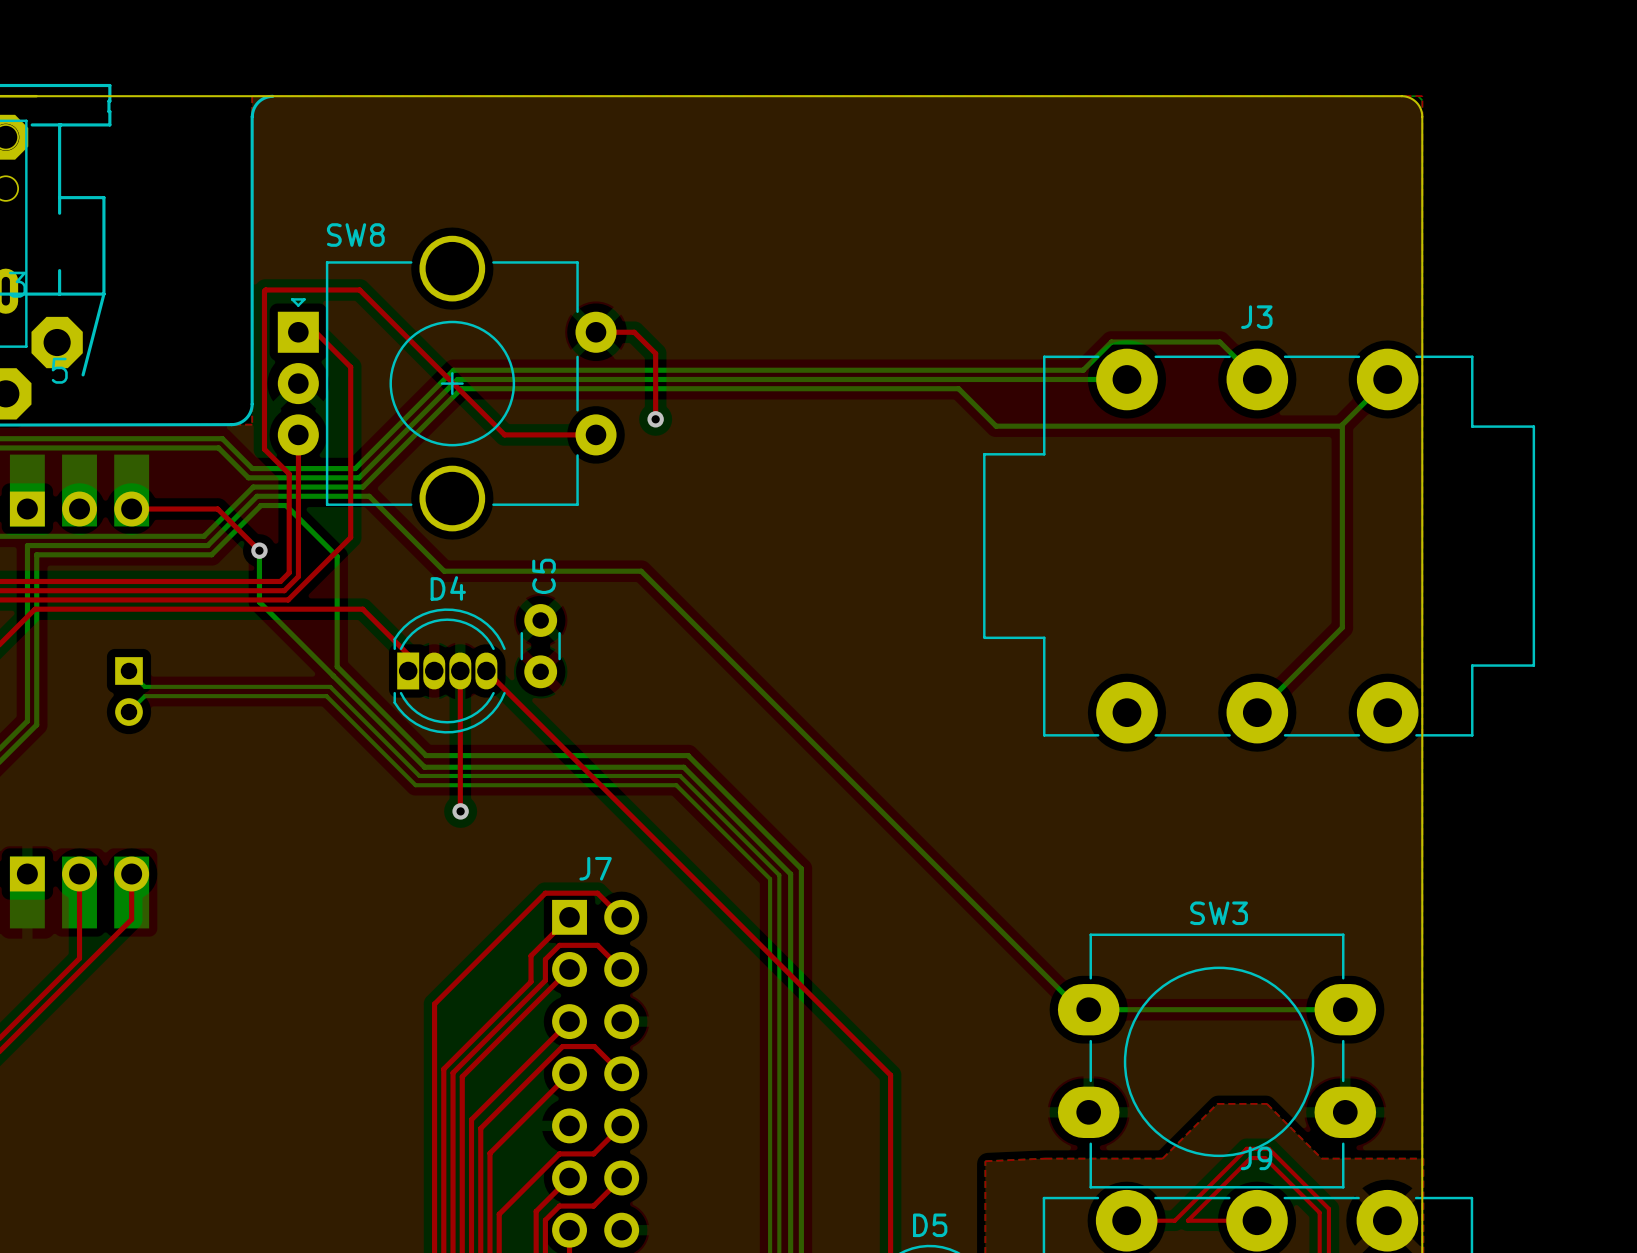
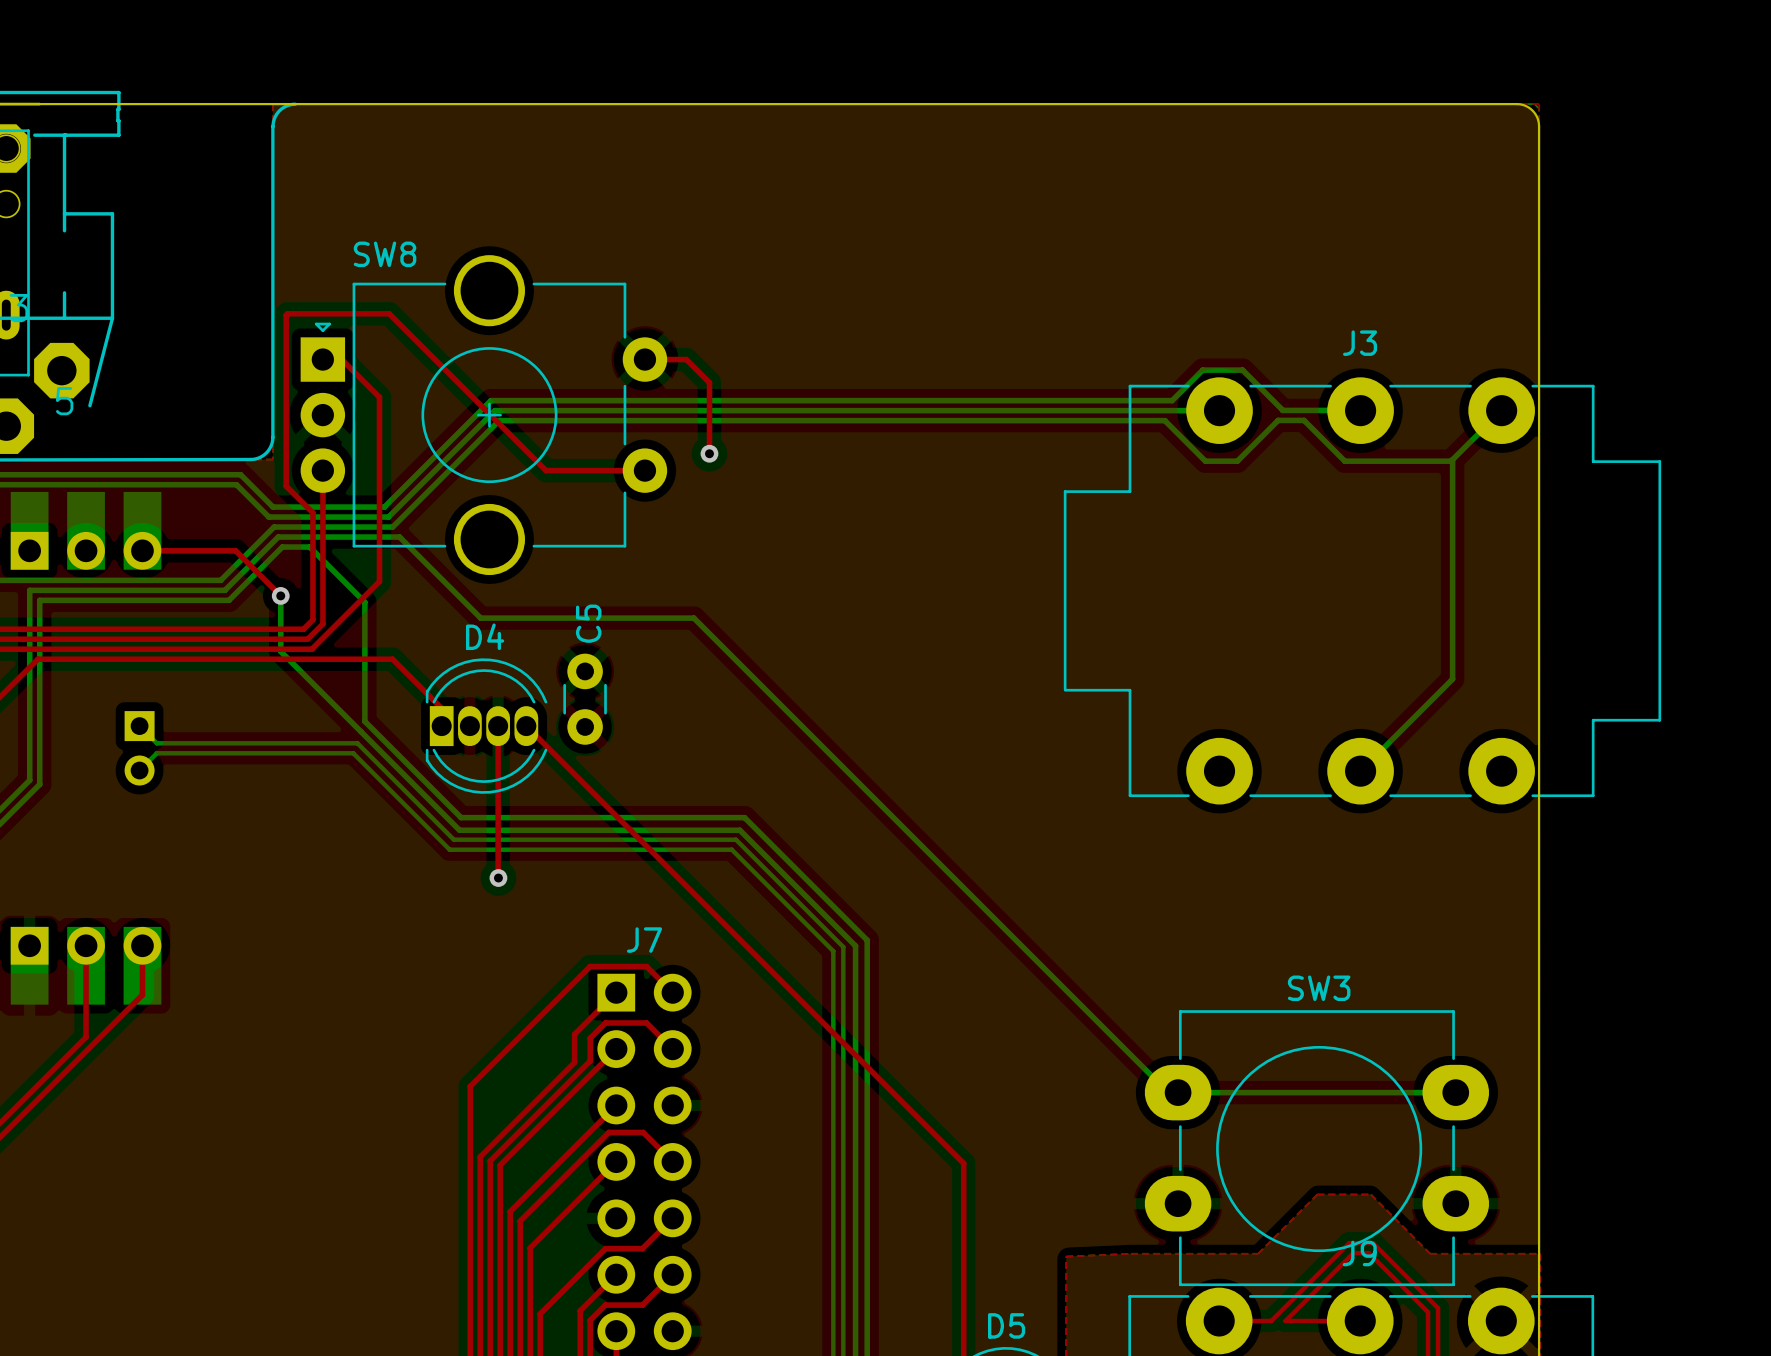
bottom track: (1148, 342) (1219, 342) (1257, 379) -> (1282, 410) (1360, 410)
bottom track: none -> (1242, 370) (1282, 410)
bottom track: (958, 388) (996, 426) (1113, 426) -> (1037, 420) (1164, 420) (1205, 461)
bottom track: (1143, 426) (1242, 426) -> (1237, 461) (1278, 420) (1304, 420) (1344, 461)

